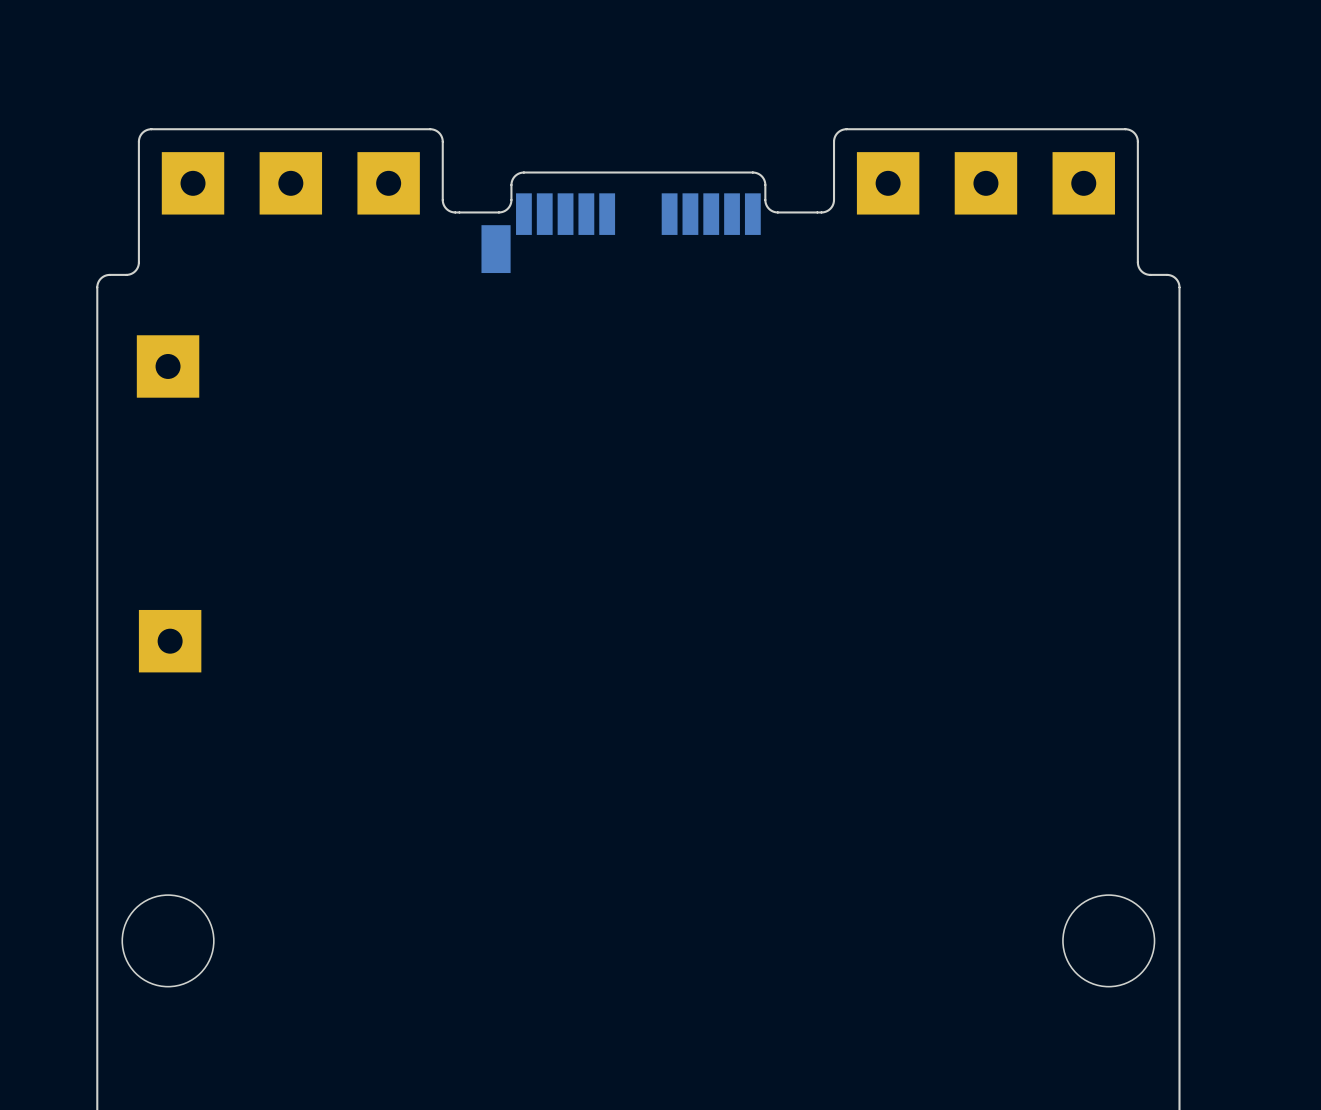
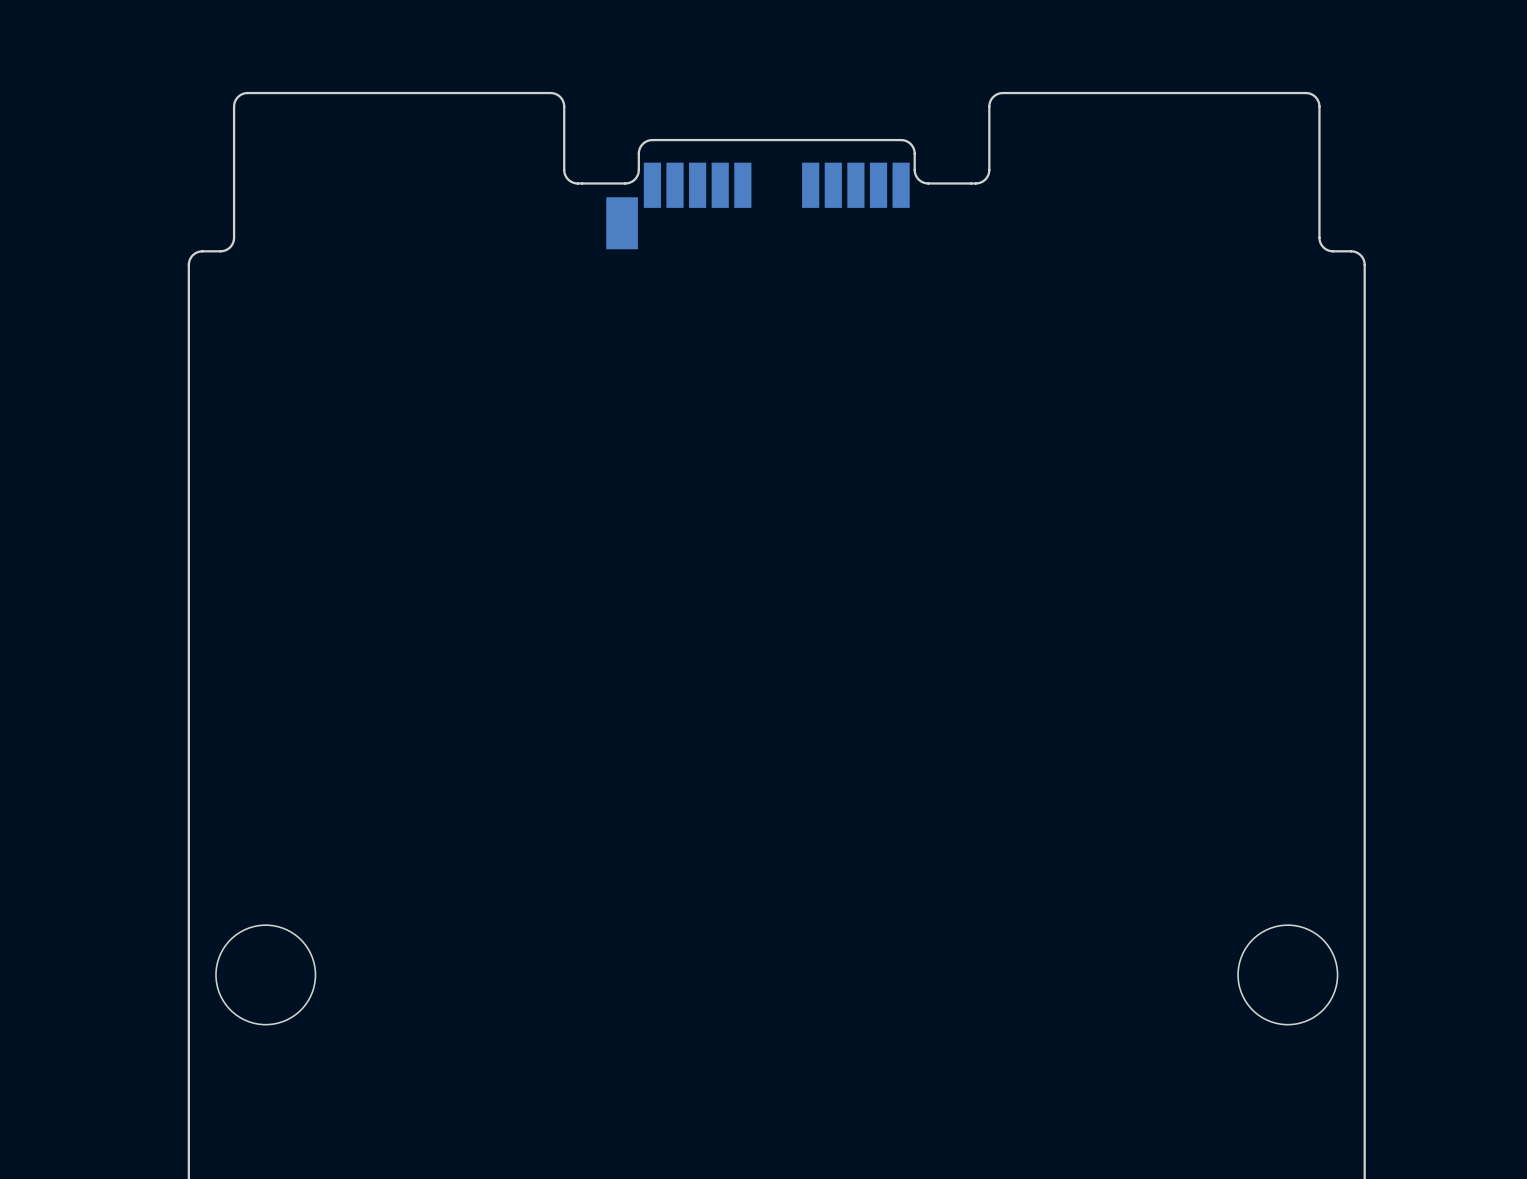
part: (193, 183) -> none
part: (290, 183) -> none
part: (388, 183) -> none
part: (888, 183) -> none
part: (985, 183) -> none
part: (1083, 183) -> none
part: (168, 366) -> none
part: (170, 641) -> none

